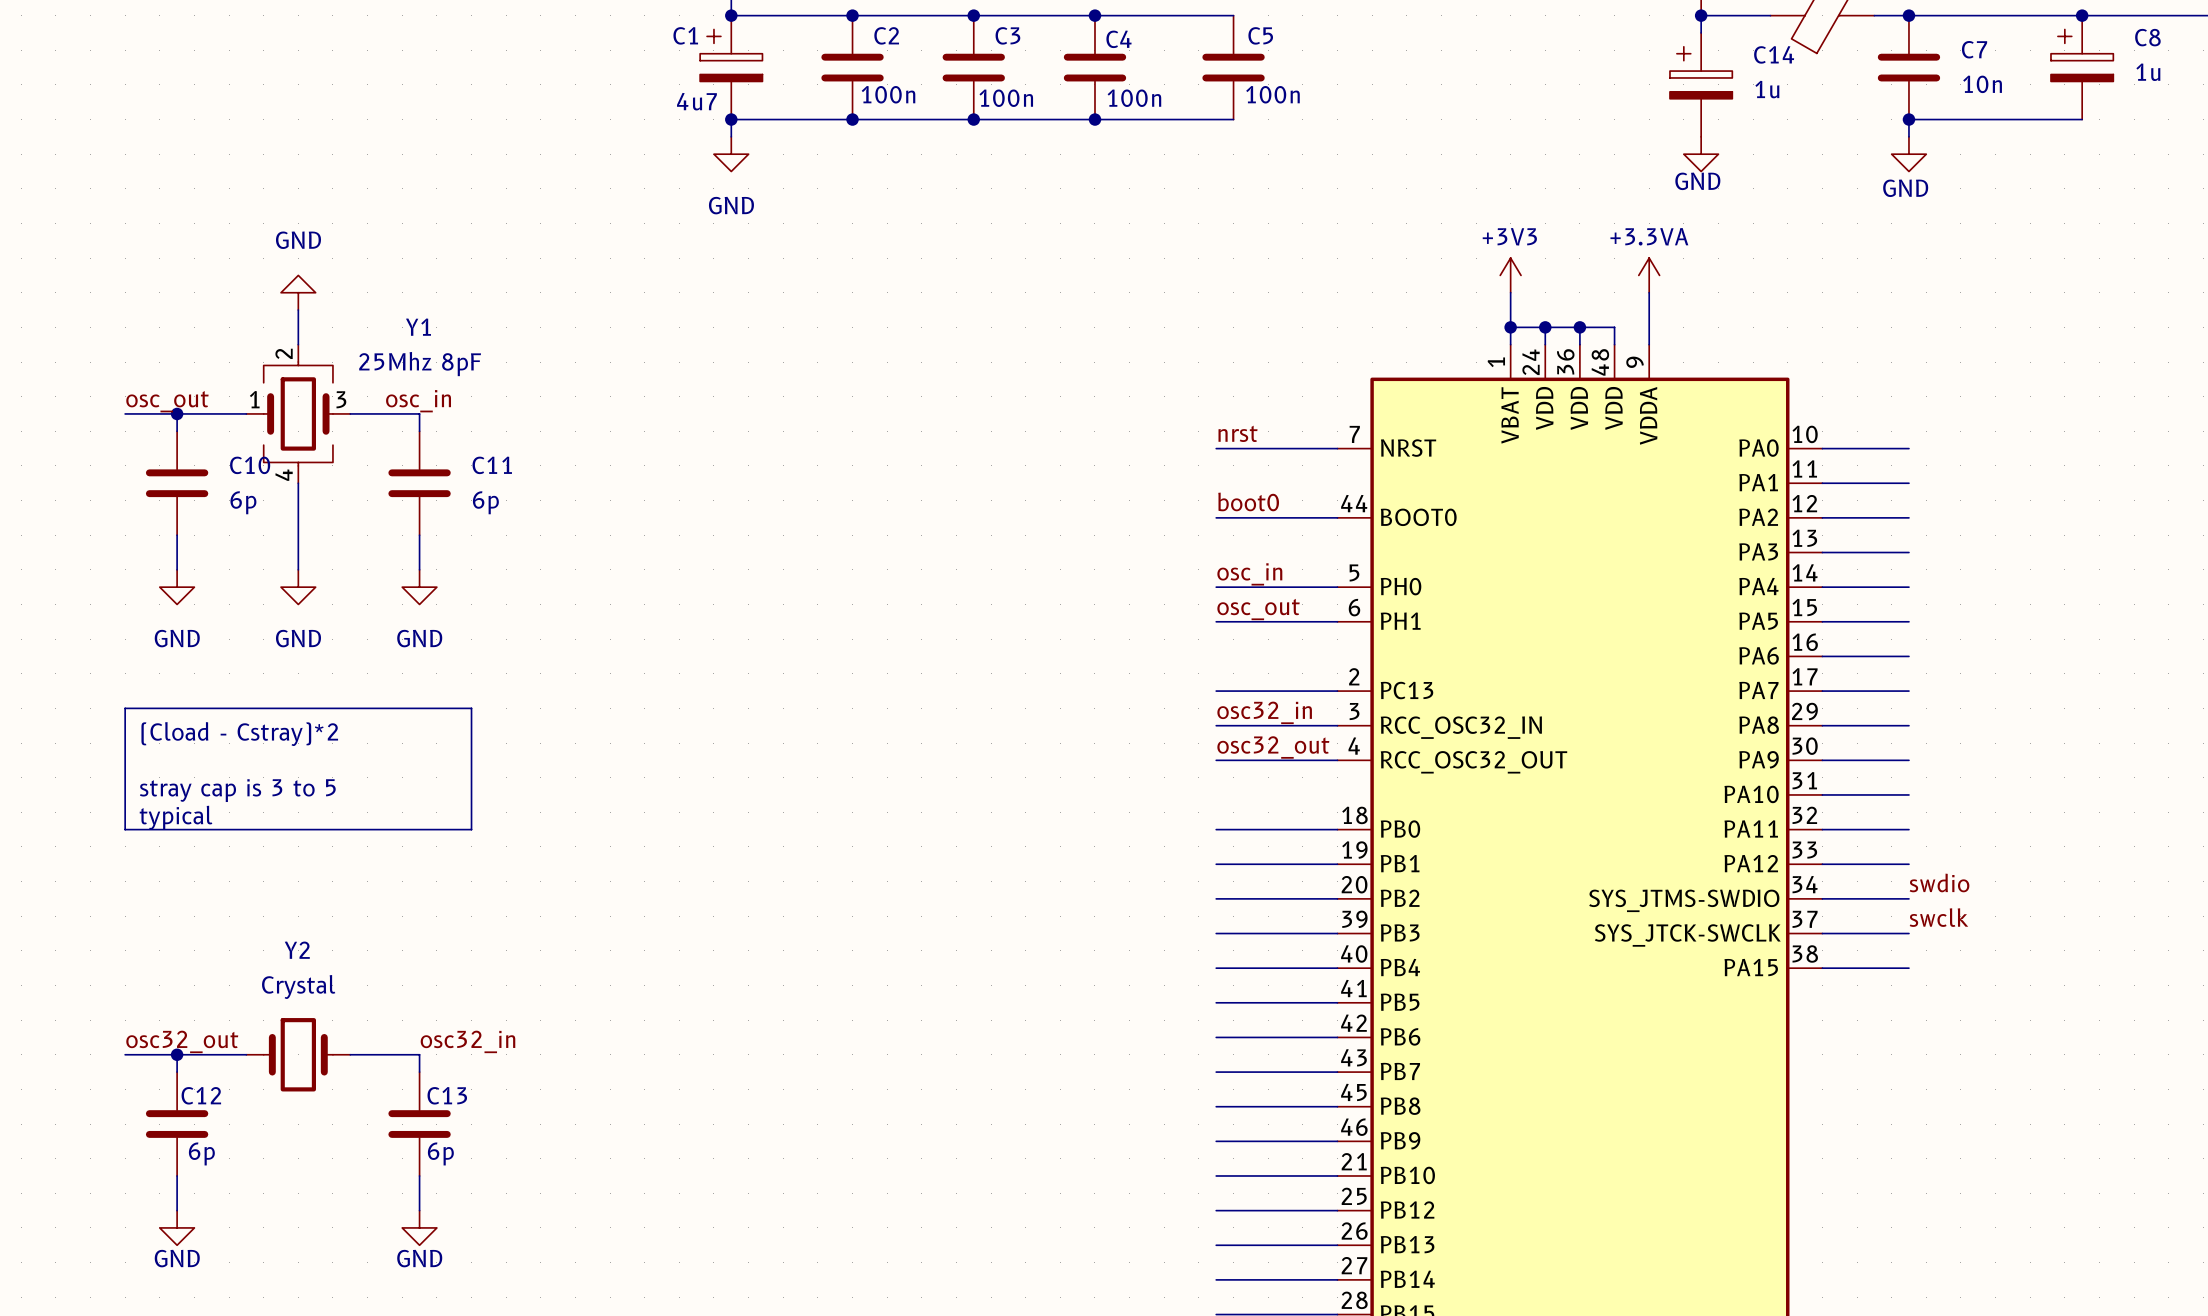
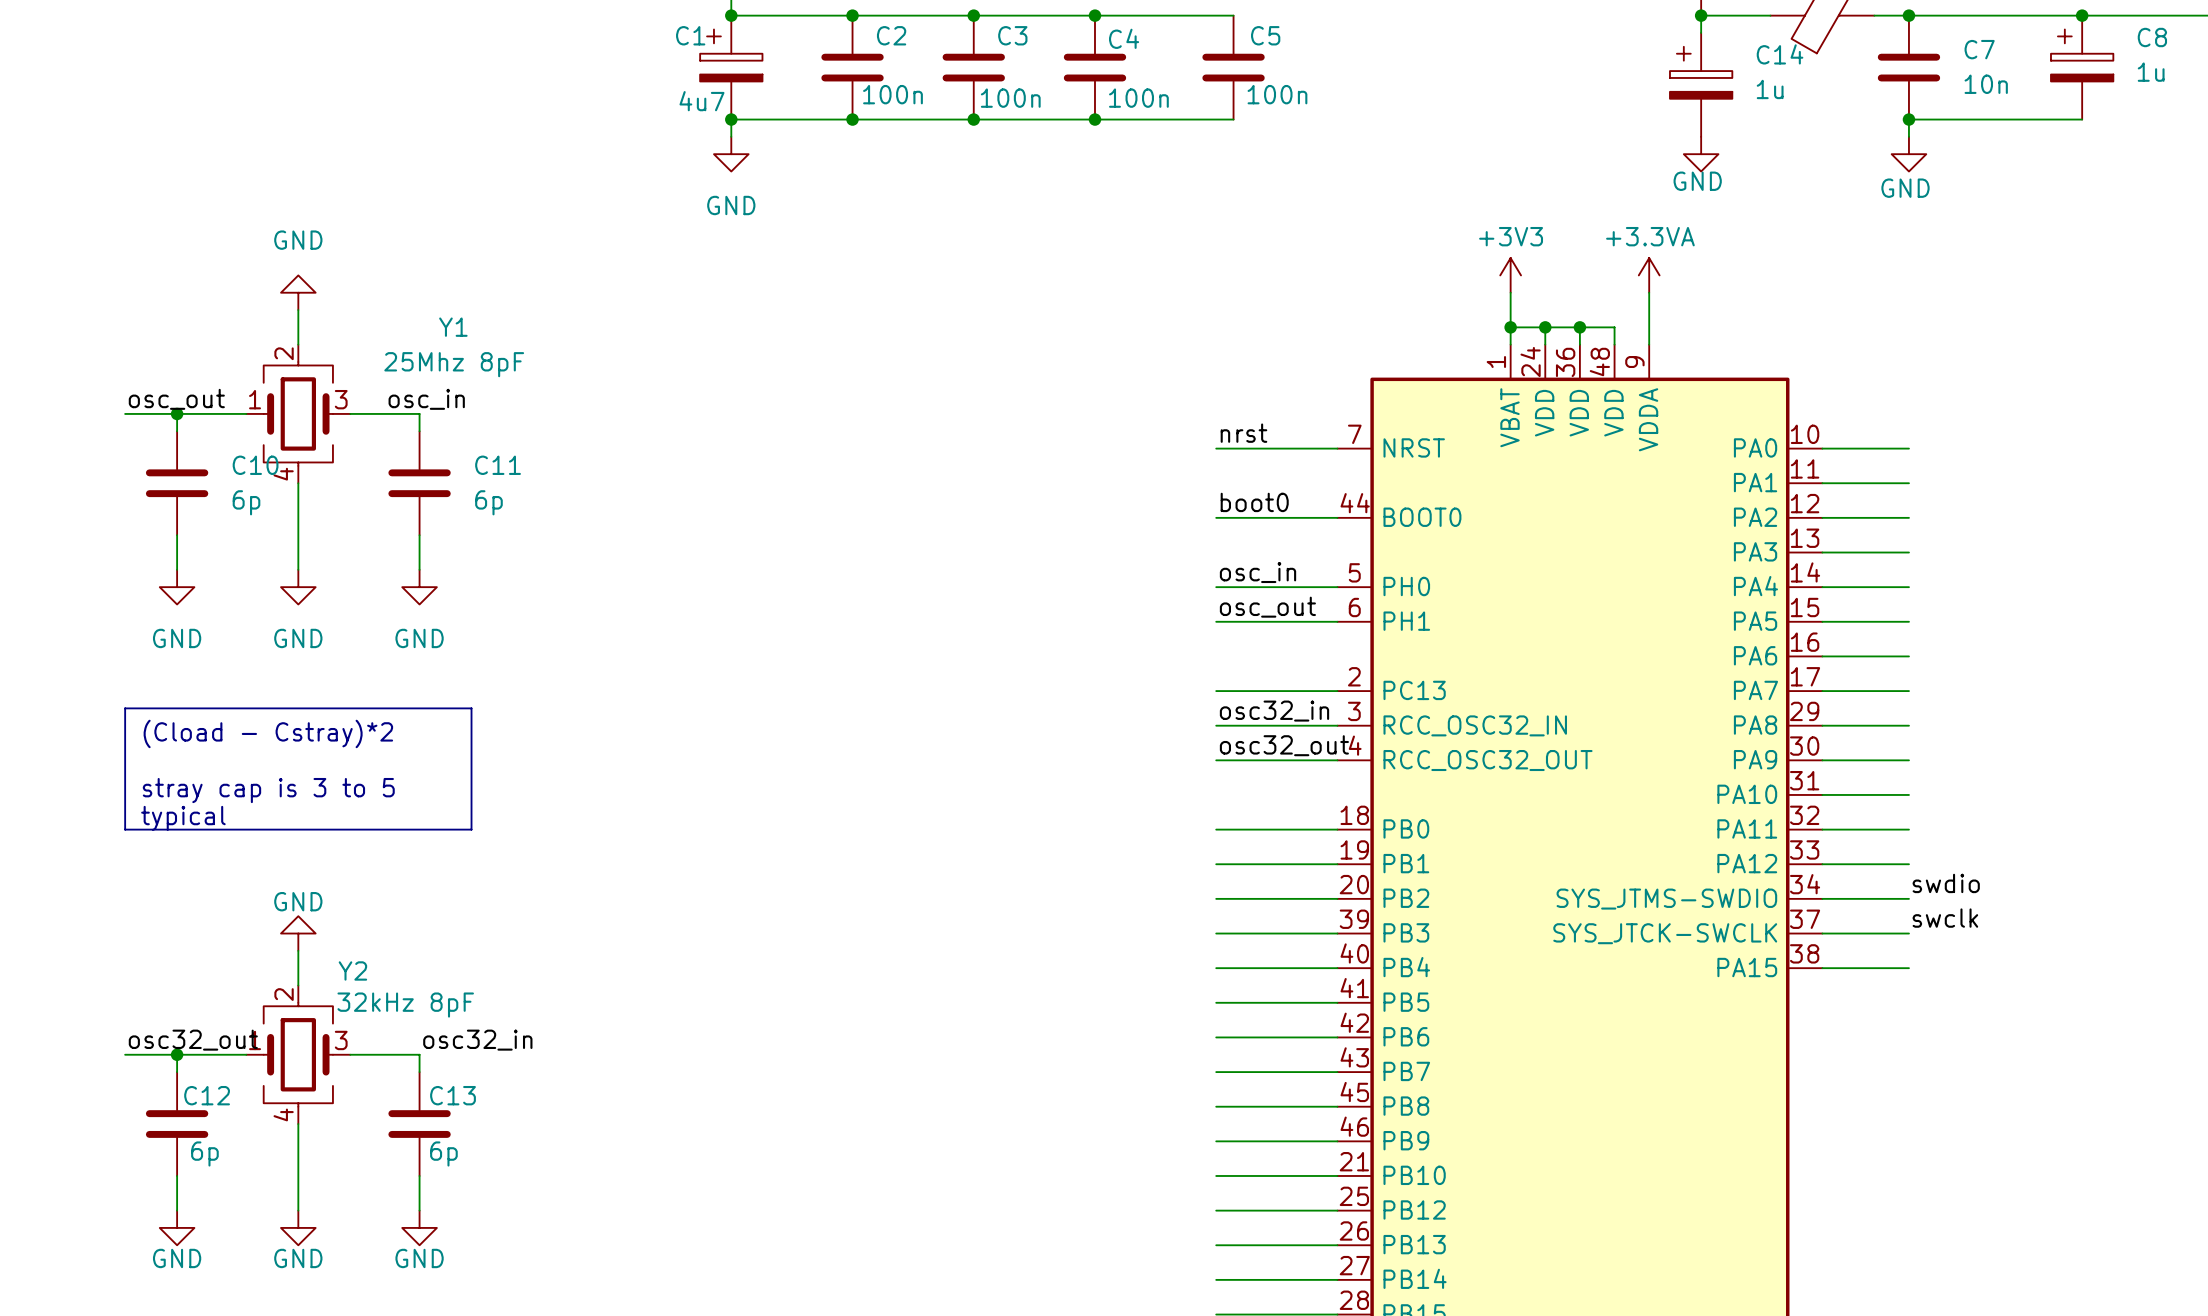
Y1 name position: Y1 (418, 327) -> Y1 (453, 327)
Y1 value position: 25Mhz 8pF (420, 364) -> 25Mhz 8pF (454, 364)
power symbol: none -> GND (298, 933)
Y2 name position: Y2 (297, 950) -> Y2 (352, 970)
wire: none -> (298, 950) (298, 985)
Y2 value: Crystal (298, 987) -> 32kHz 8pF (405, 1005)
Y2 symbol: [246, 1018, 351, 1092] -> [246, 985, 351, 1125]
wire: none -> (298, 1124) (298, 1210)
power symbol: none -> GND (298, 1227)

